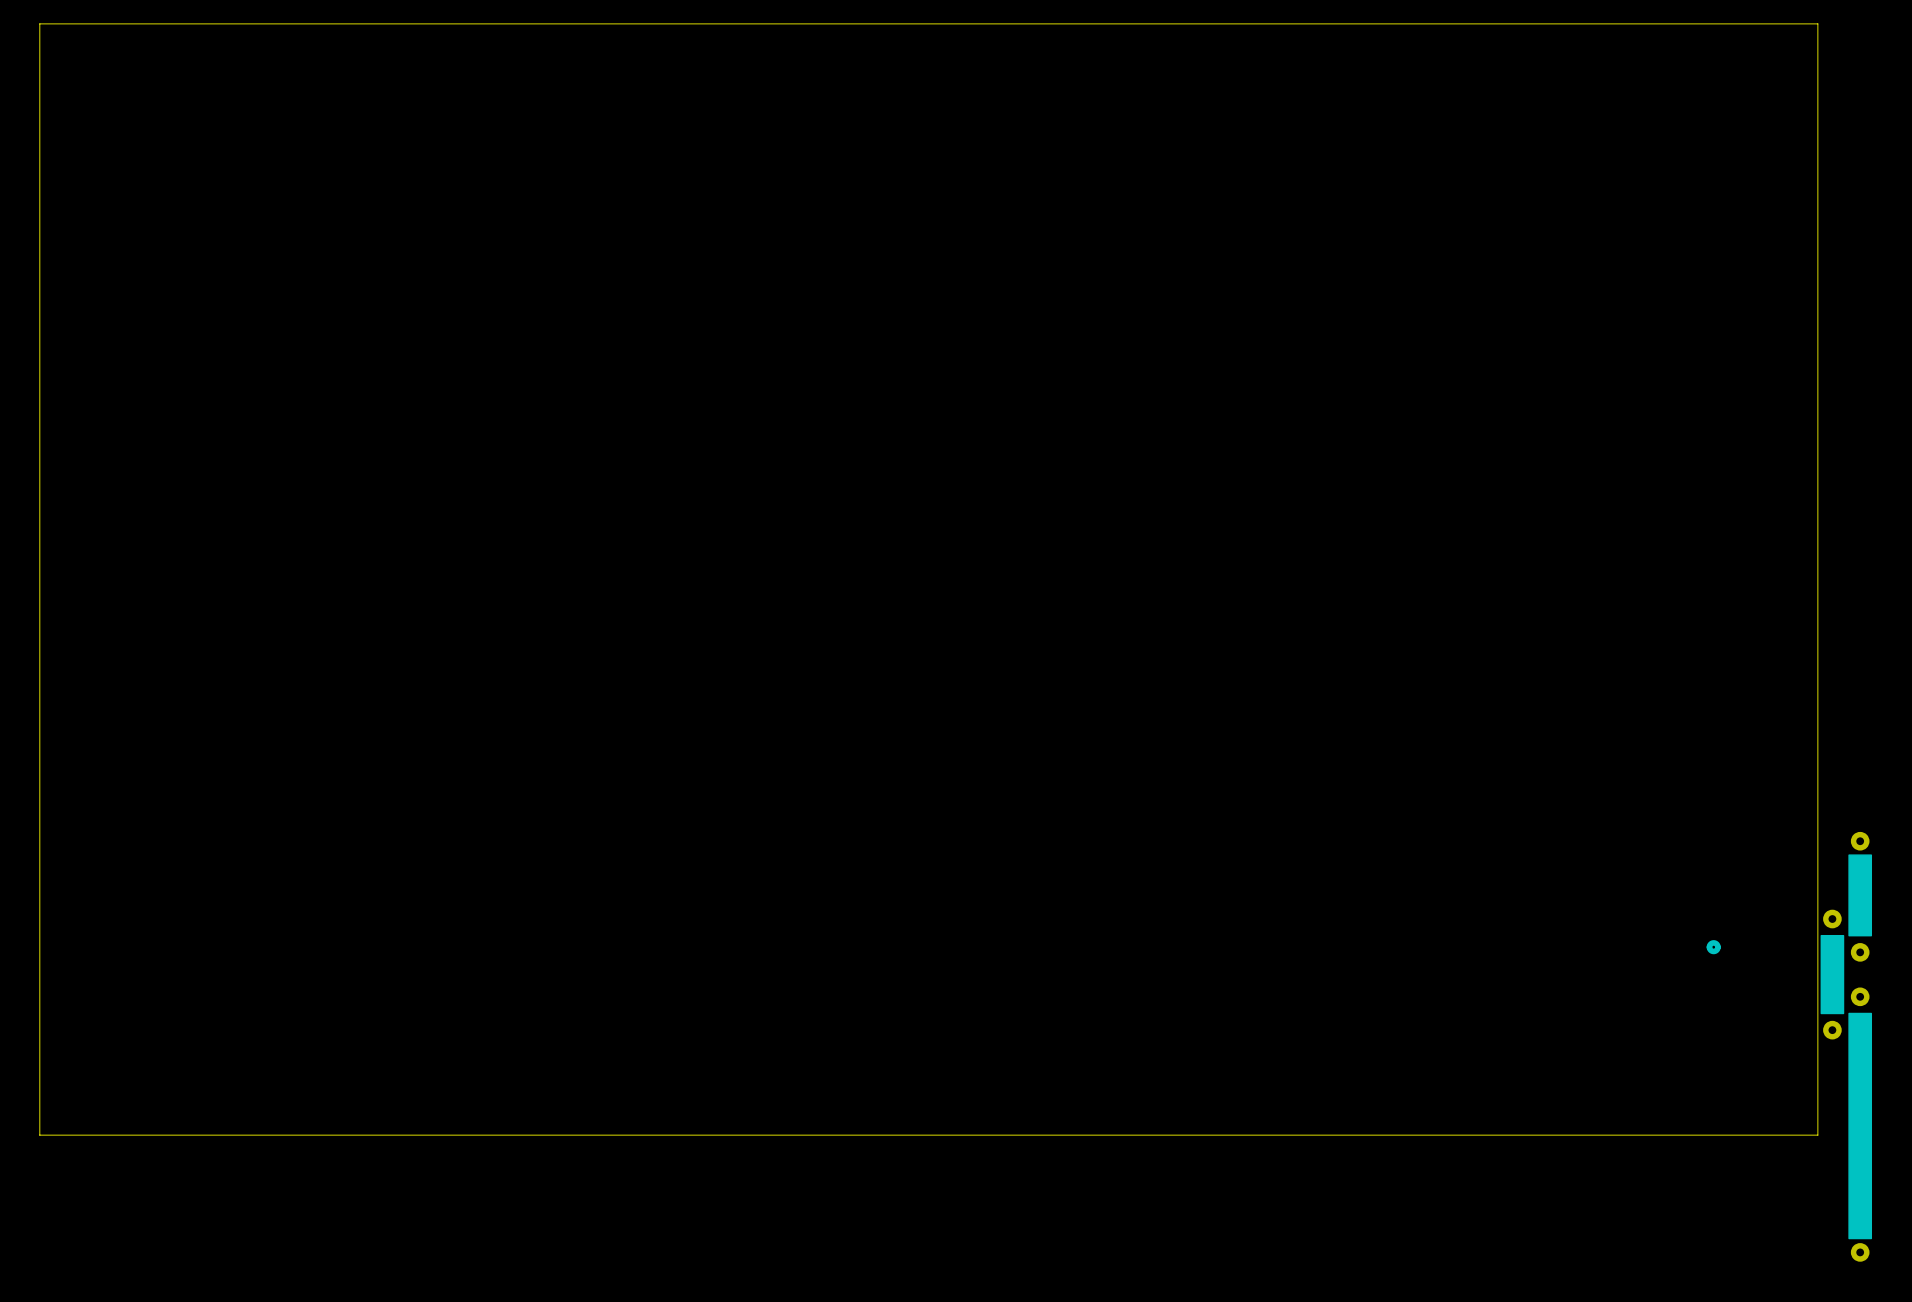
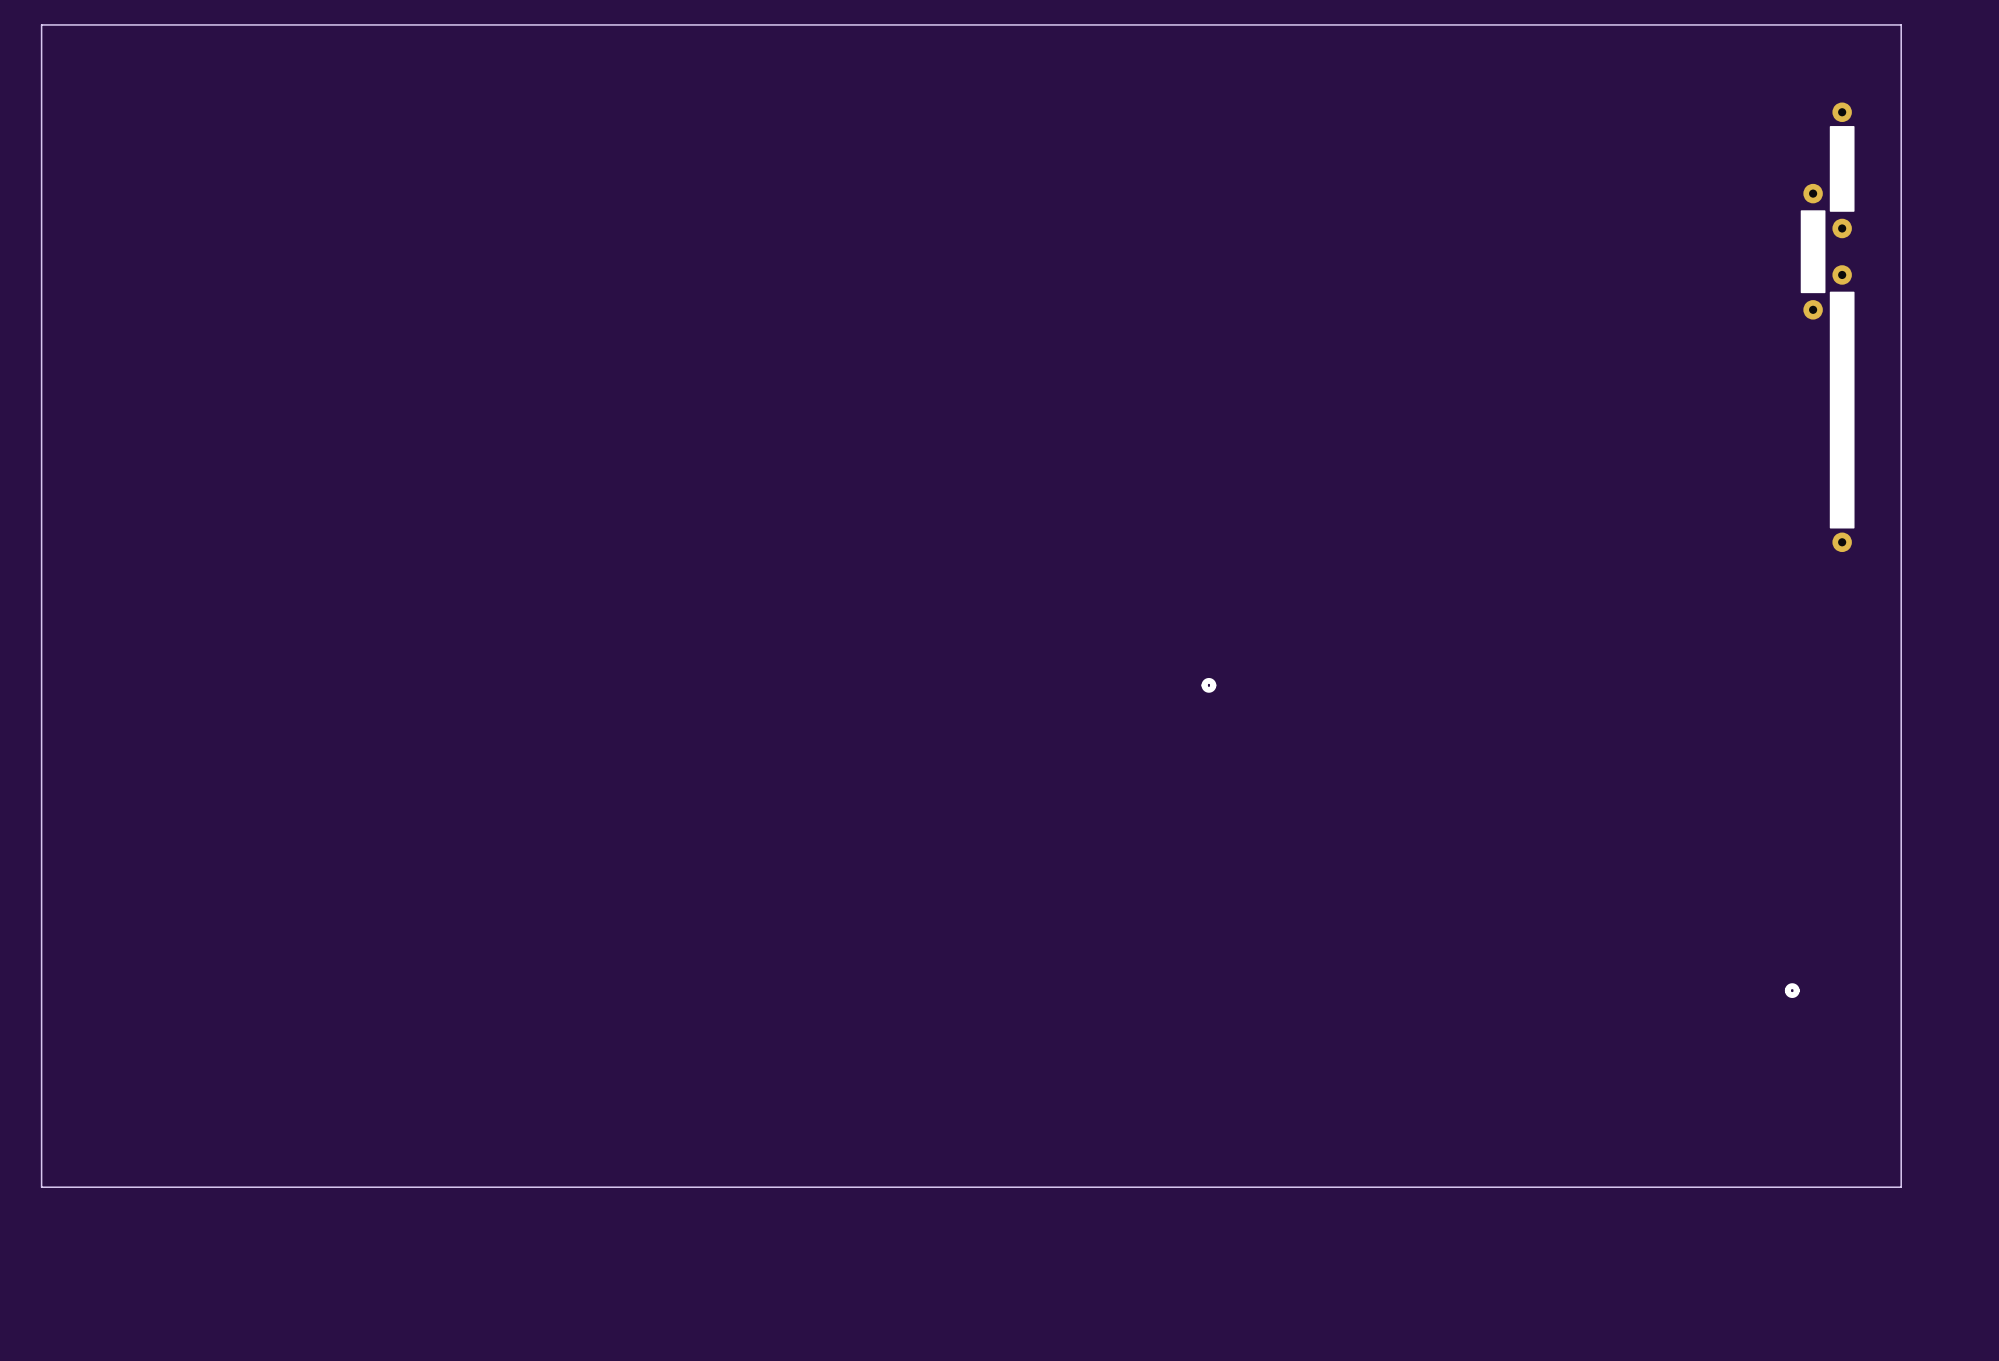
part: none -> (1827, 327)
part: none -> (1208, 685)
part: (1846, 1046) -> none

